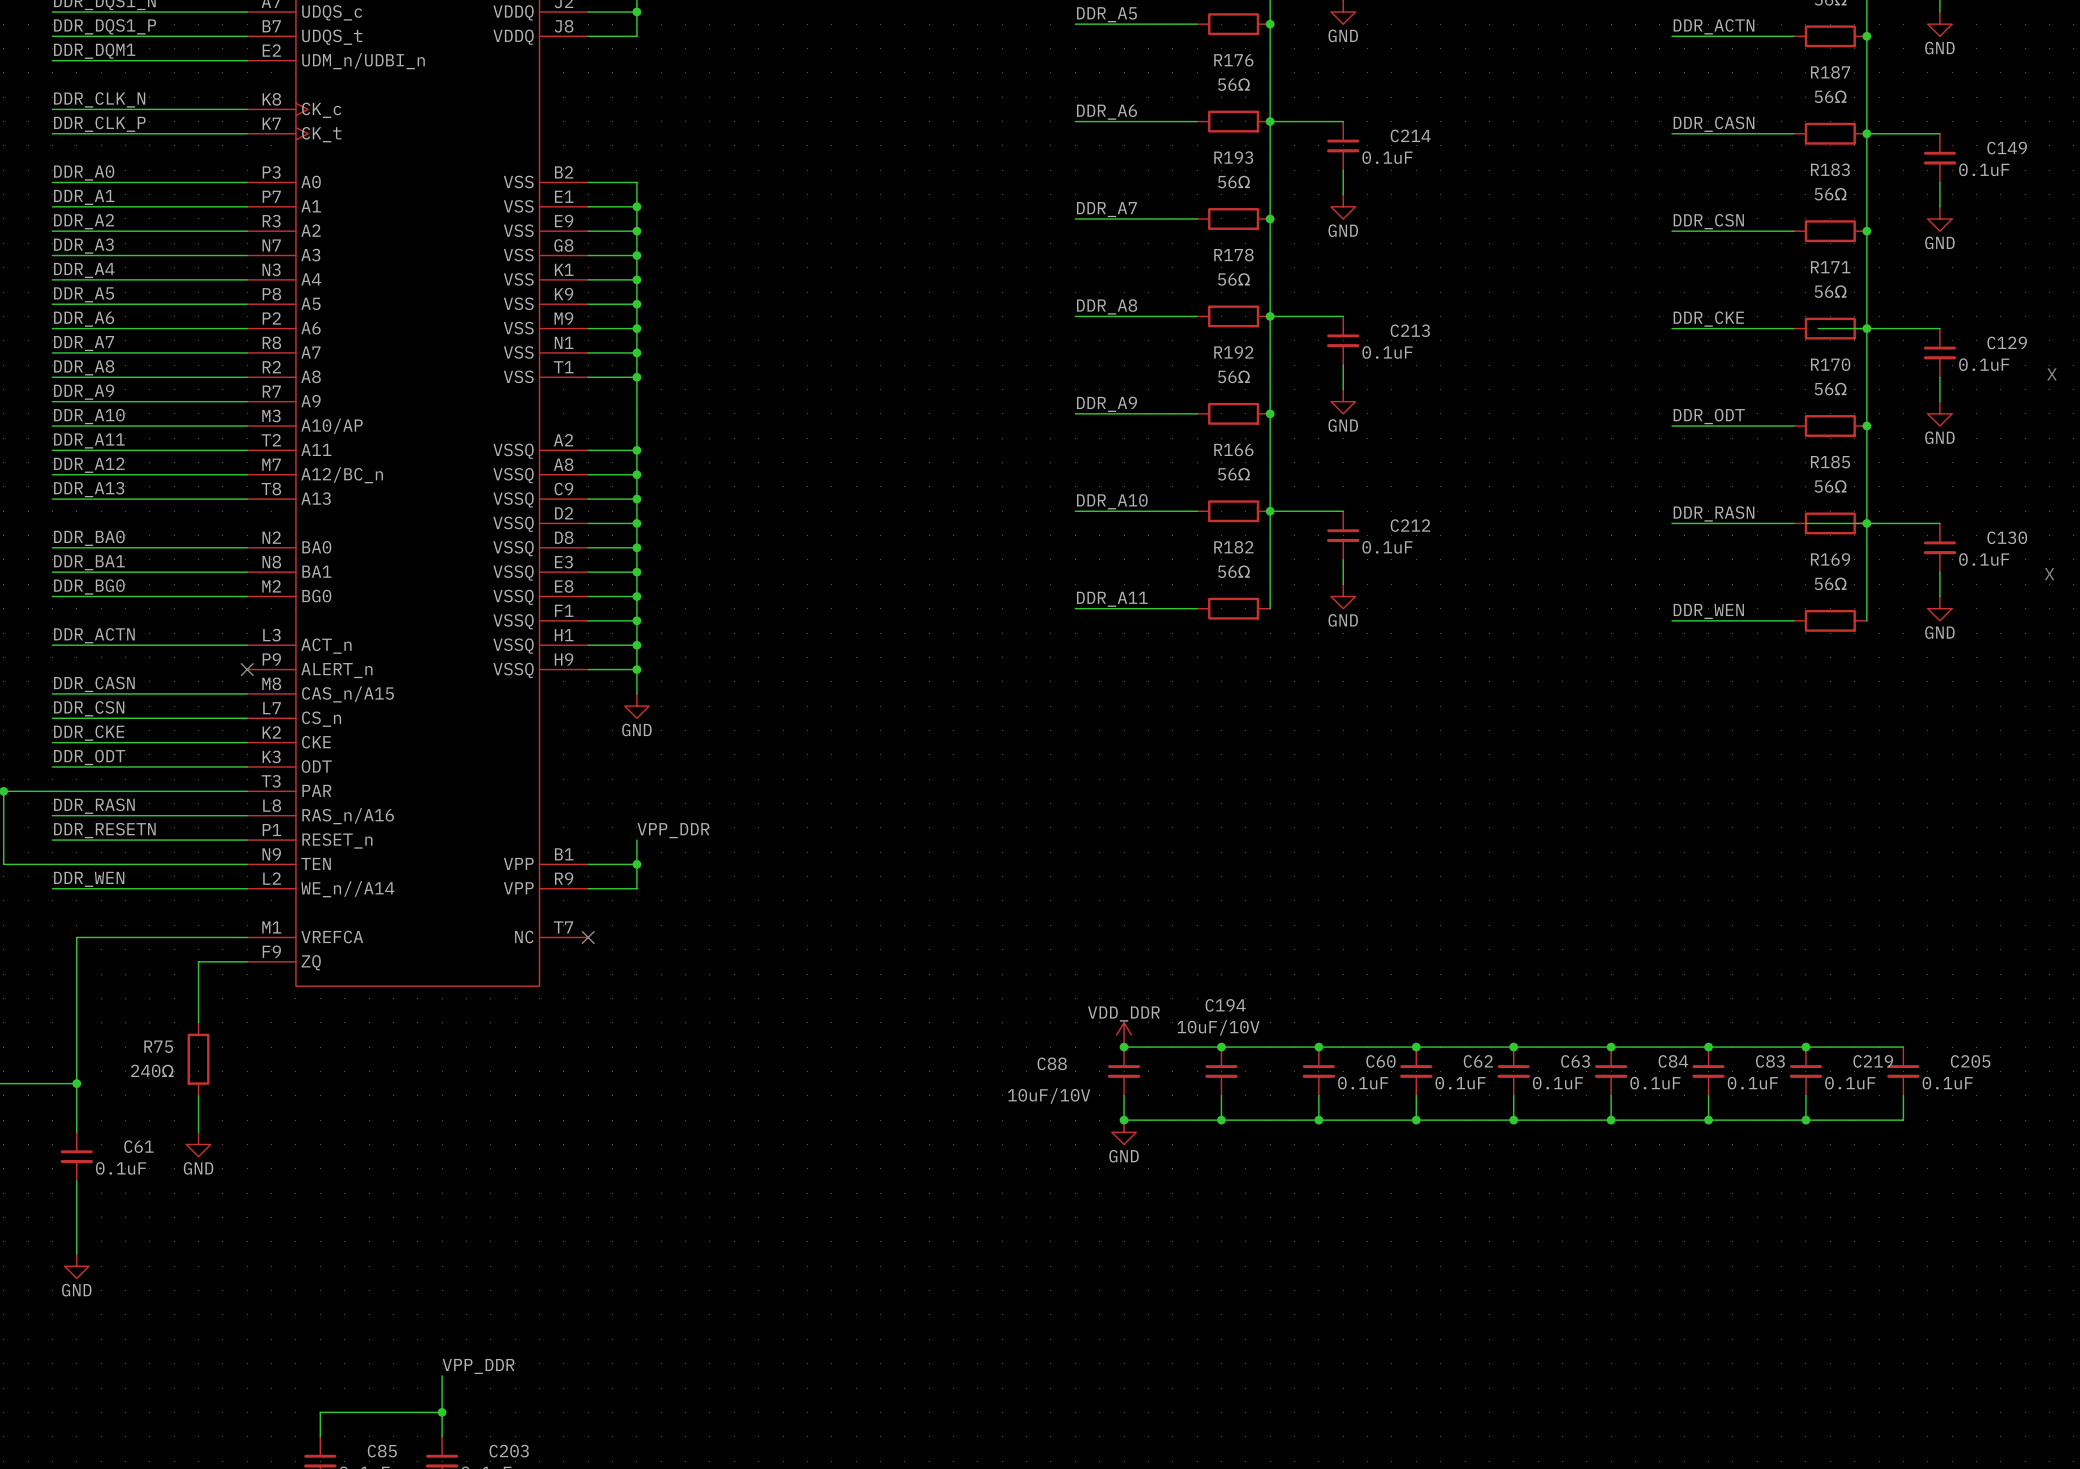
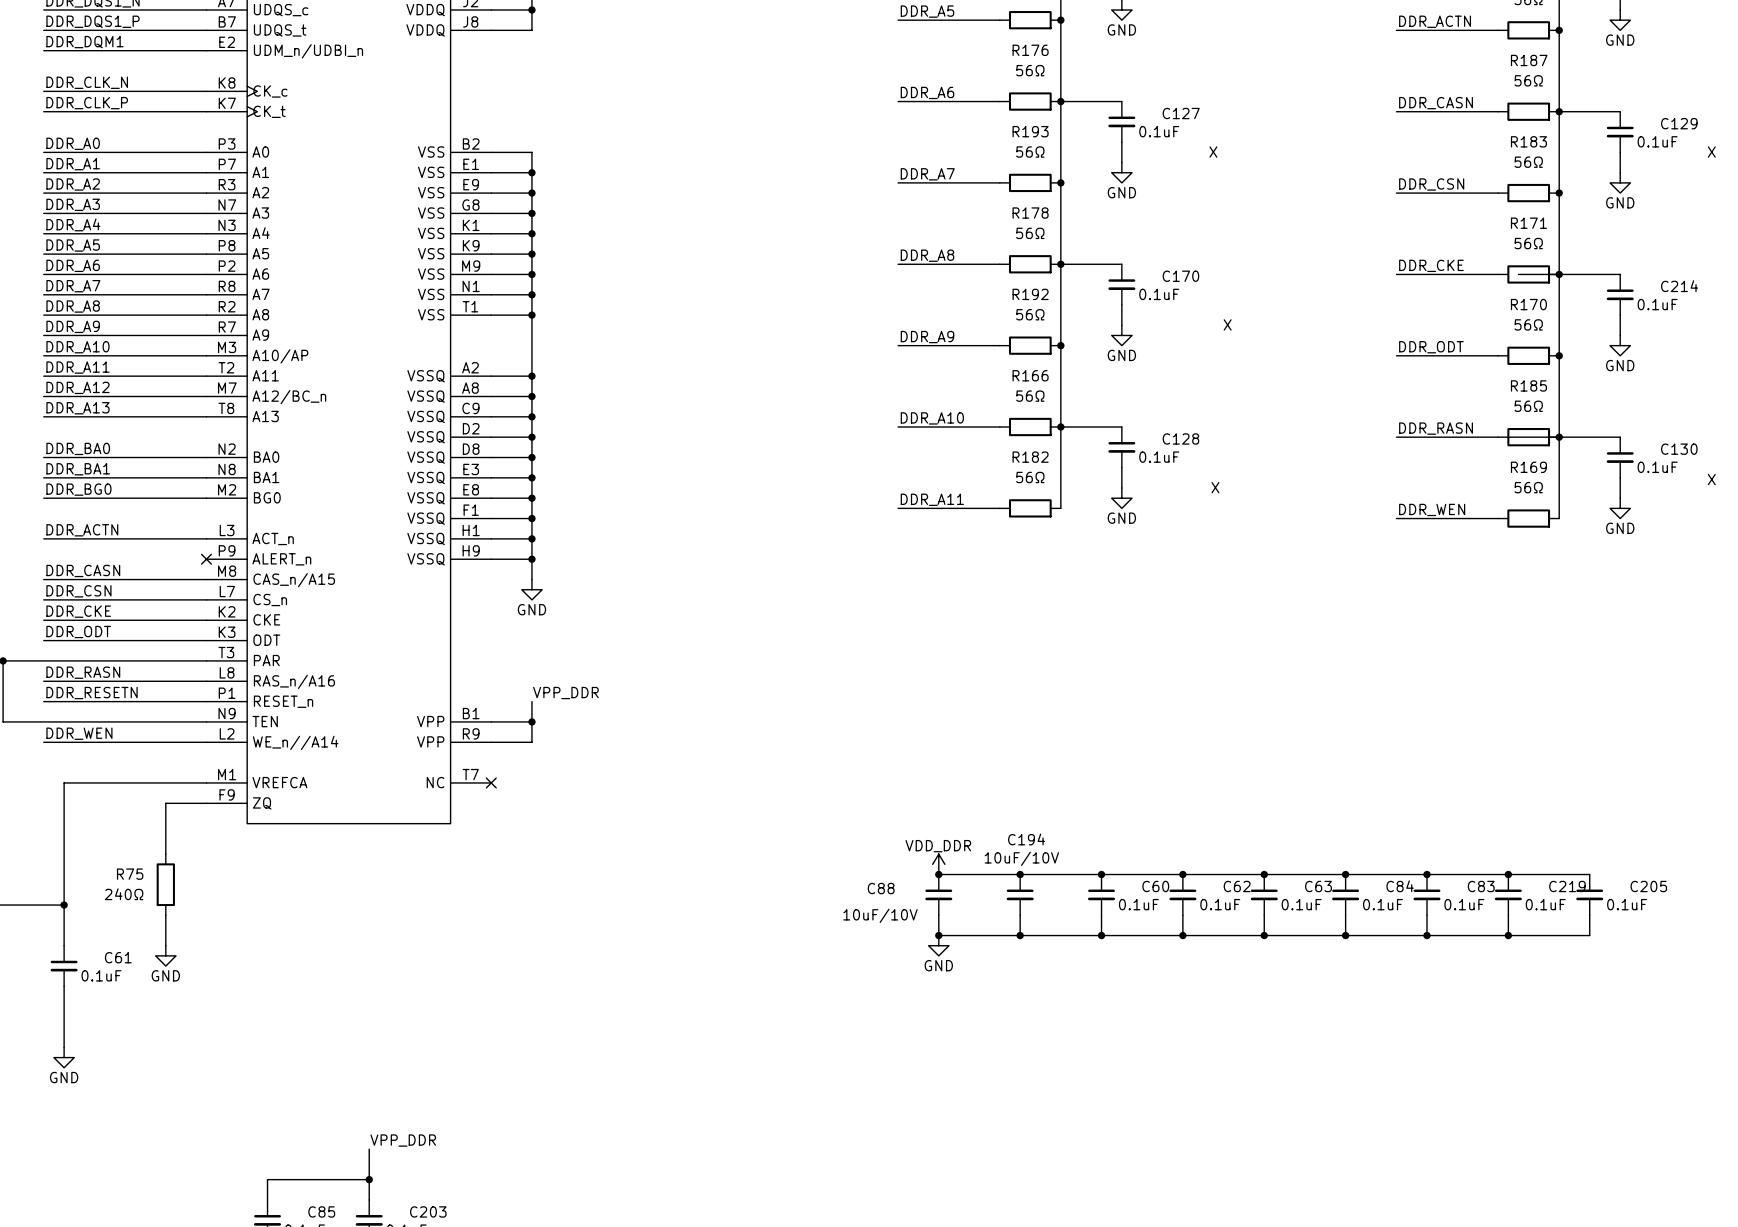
C214 name: C214 (1410, 135) -> C127 (1181, 113)
C149 name: C149 (2007, 148) -> C129 (1679, 123)
text: none -> X (1213, 152)
C213 name: C213 (1410, 330) -> C170 (1180, 276)
C129 name: C129 (2007, 342) -> C214 (1679, 286)
text position: X (2051, 374) -> X (1711, 152)
text: none -> X (1227, 324)
C212 name: C212 (1410, 525) -> C128 (1180, 438)
text: none -> X (1215, 487)

